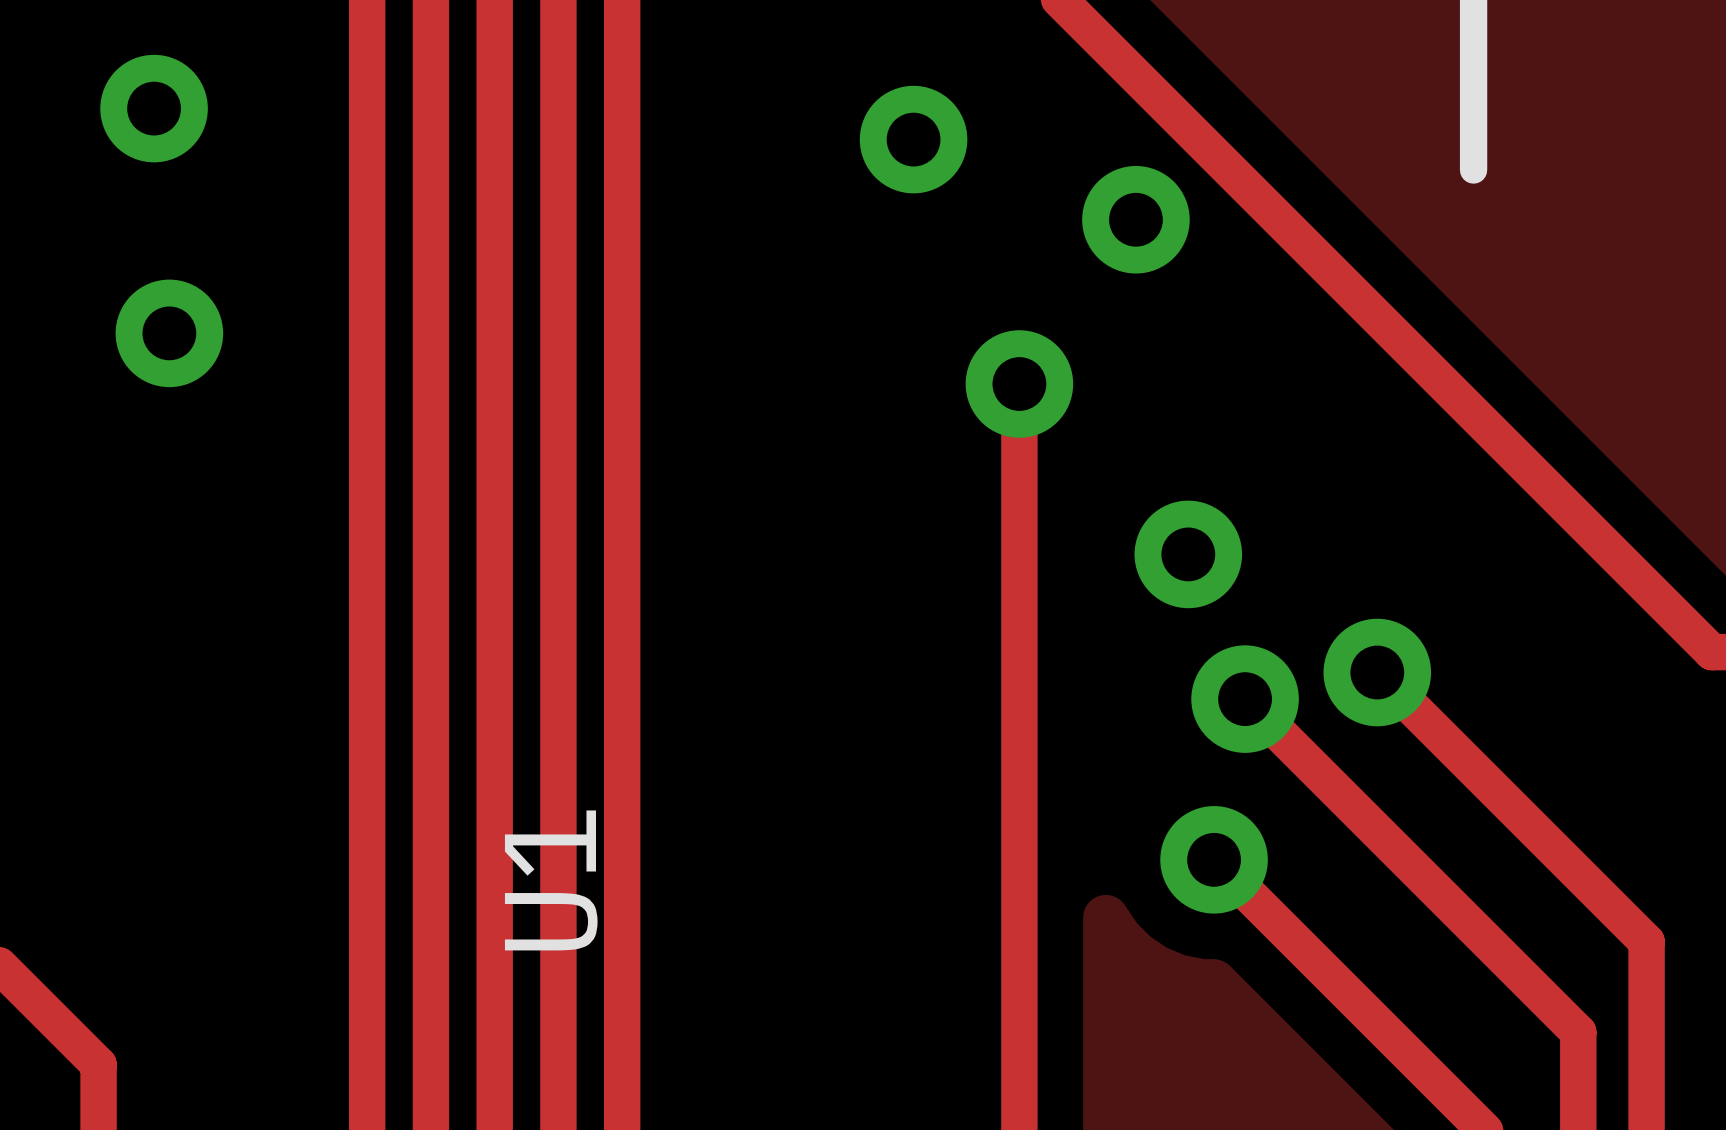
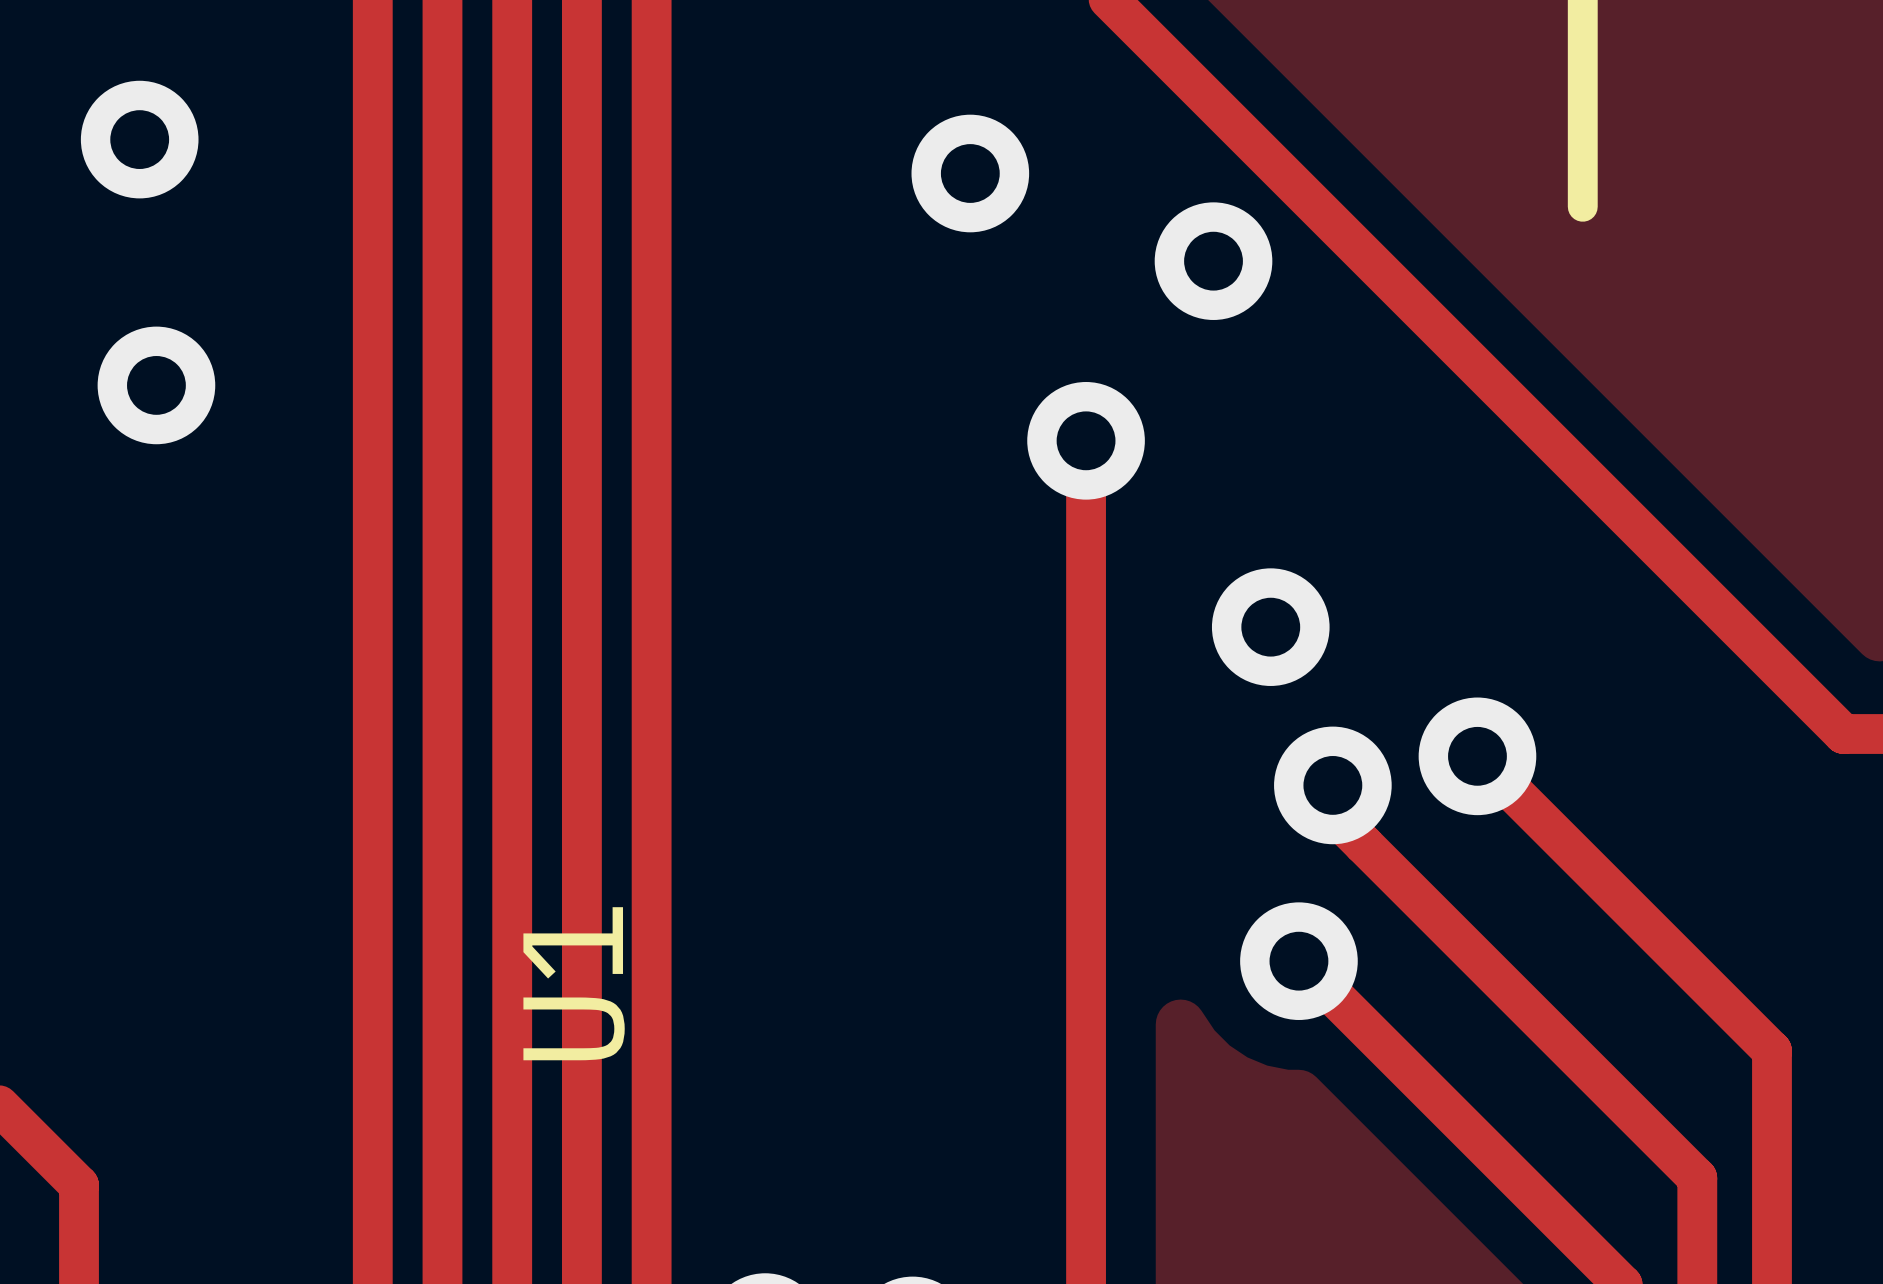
track: (1245, 699) (1578, 1032) (1578, 1058) -> (1332, 785) (1332, 813) (1697, 1178)

